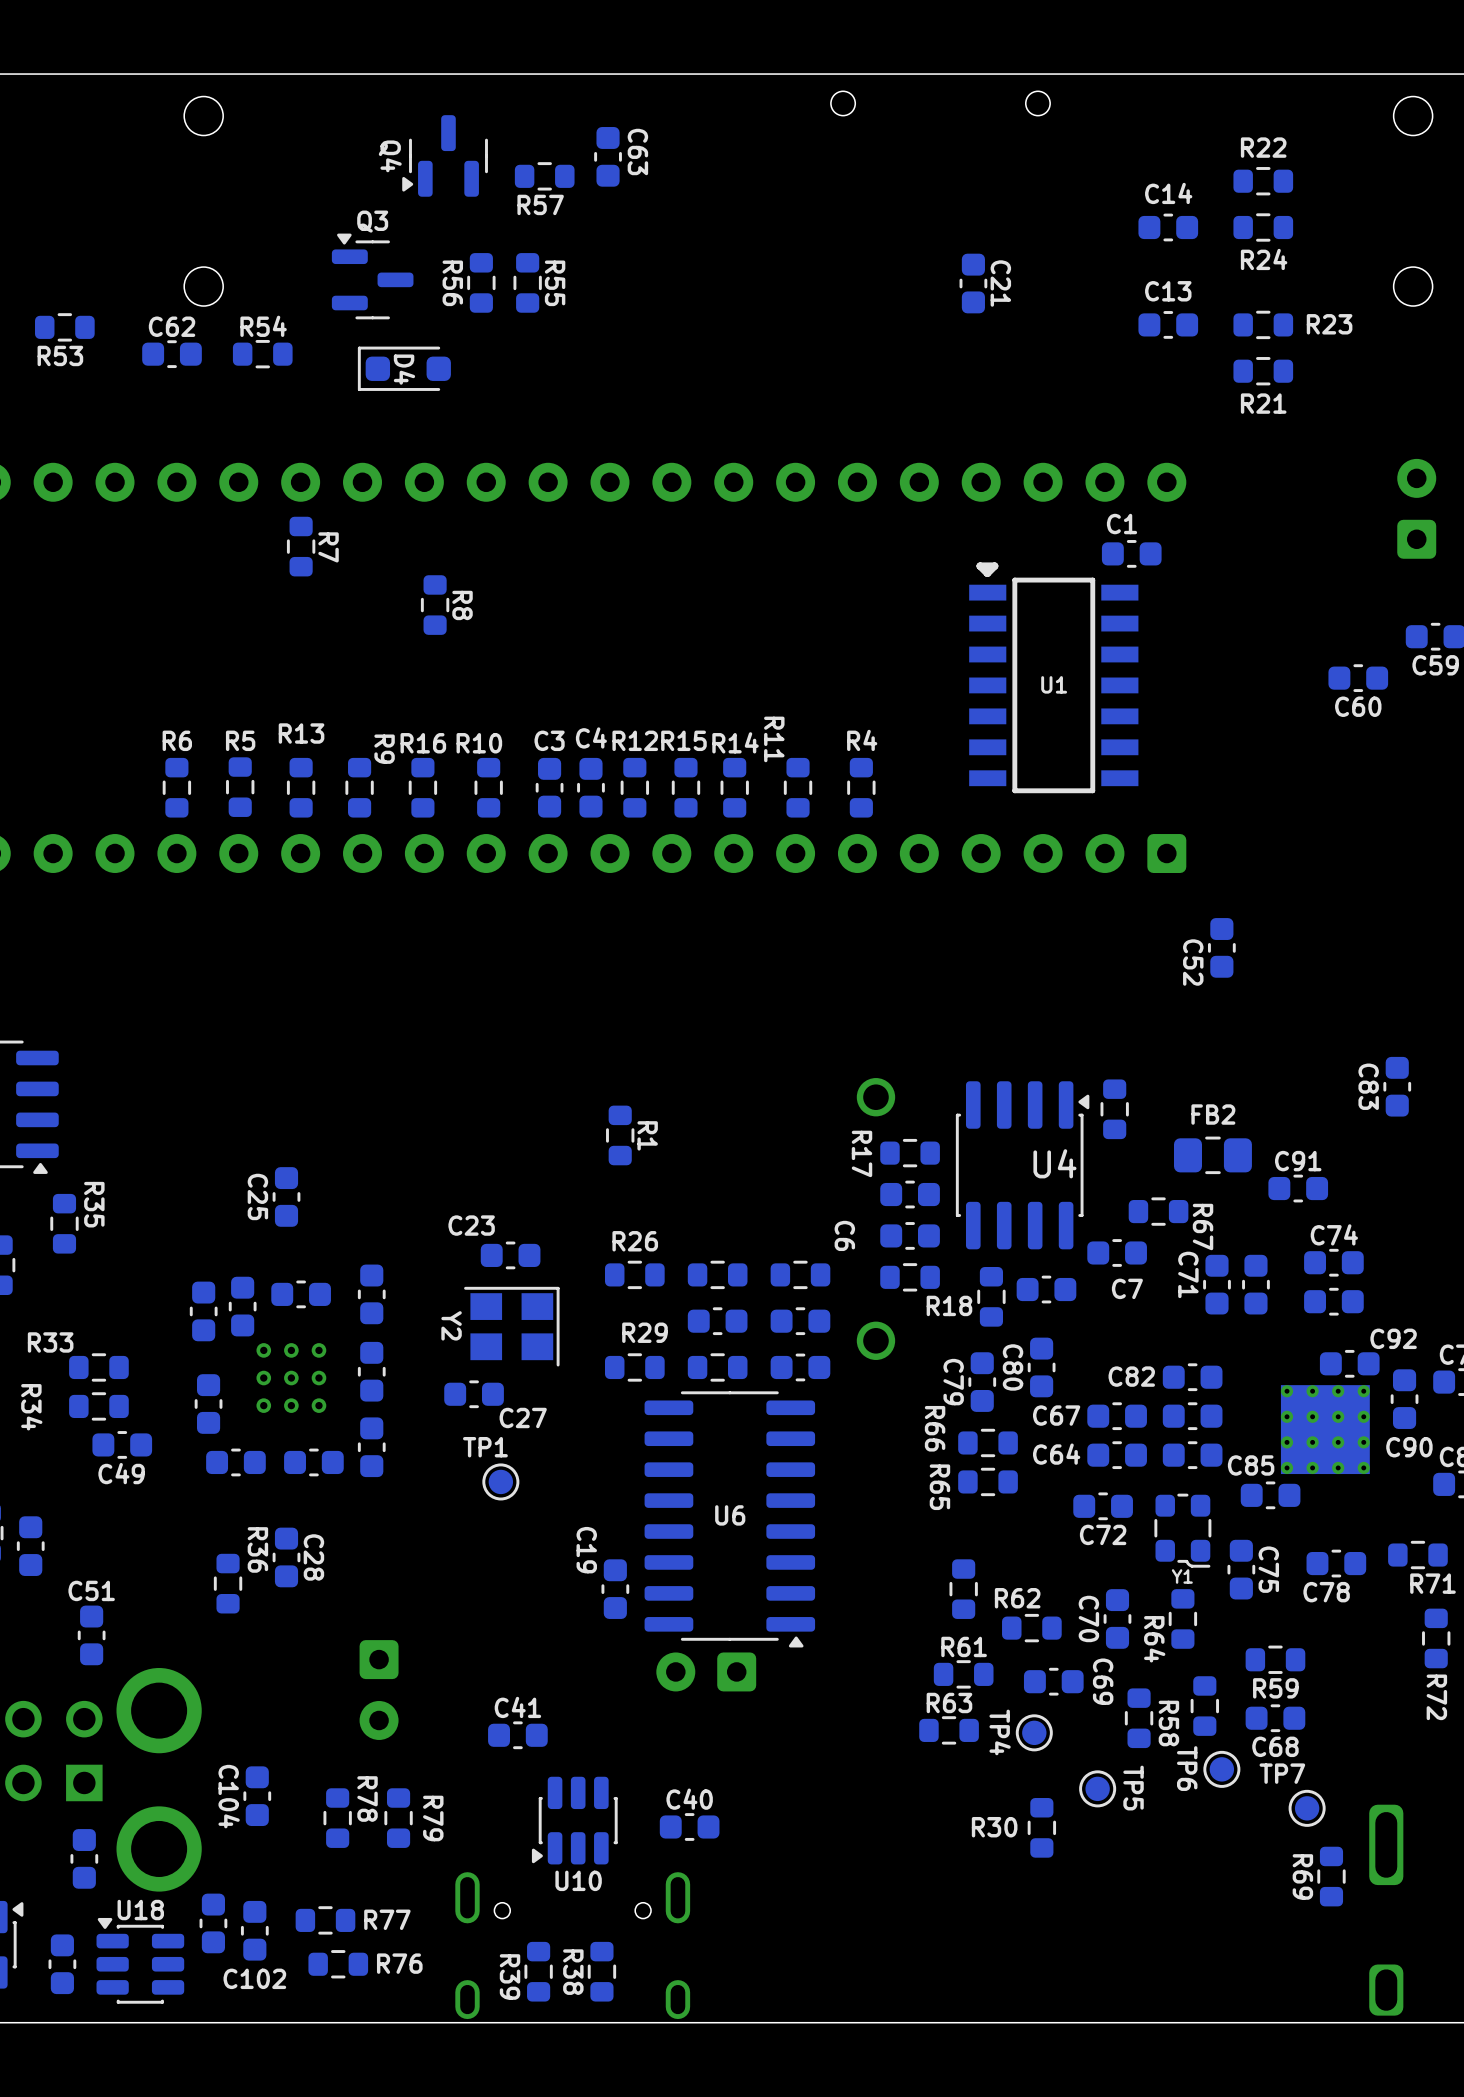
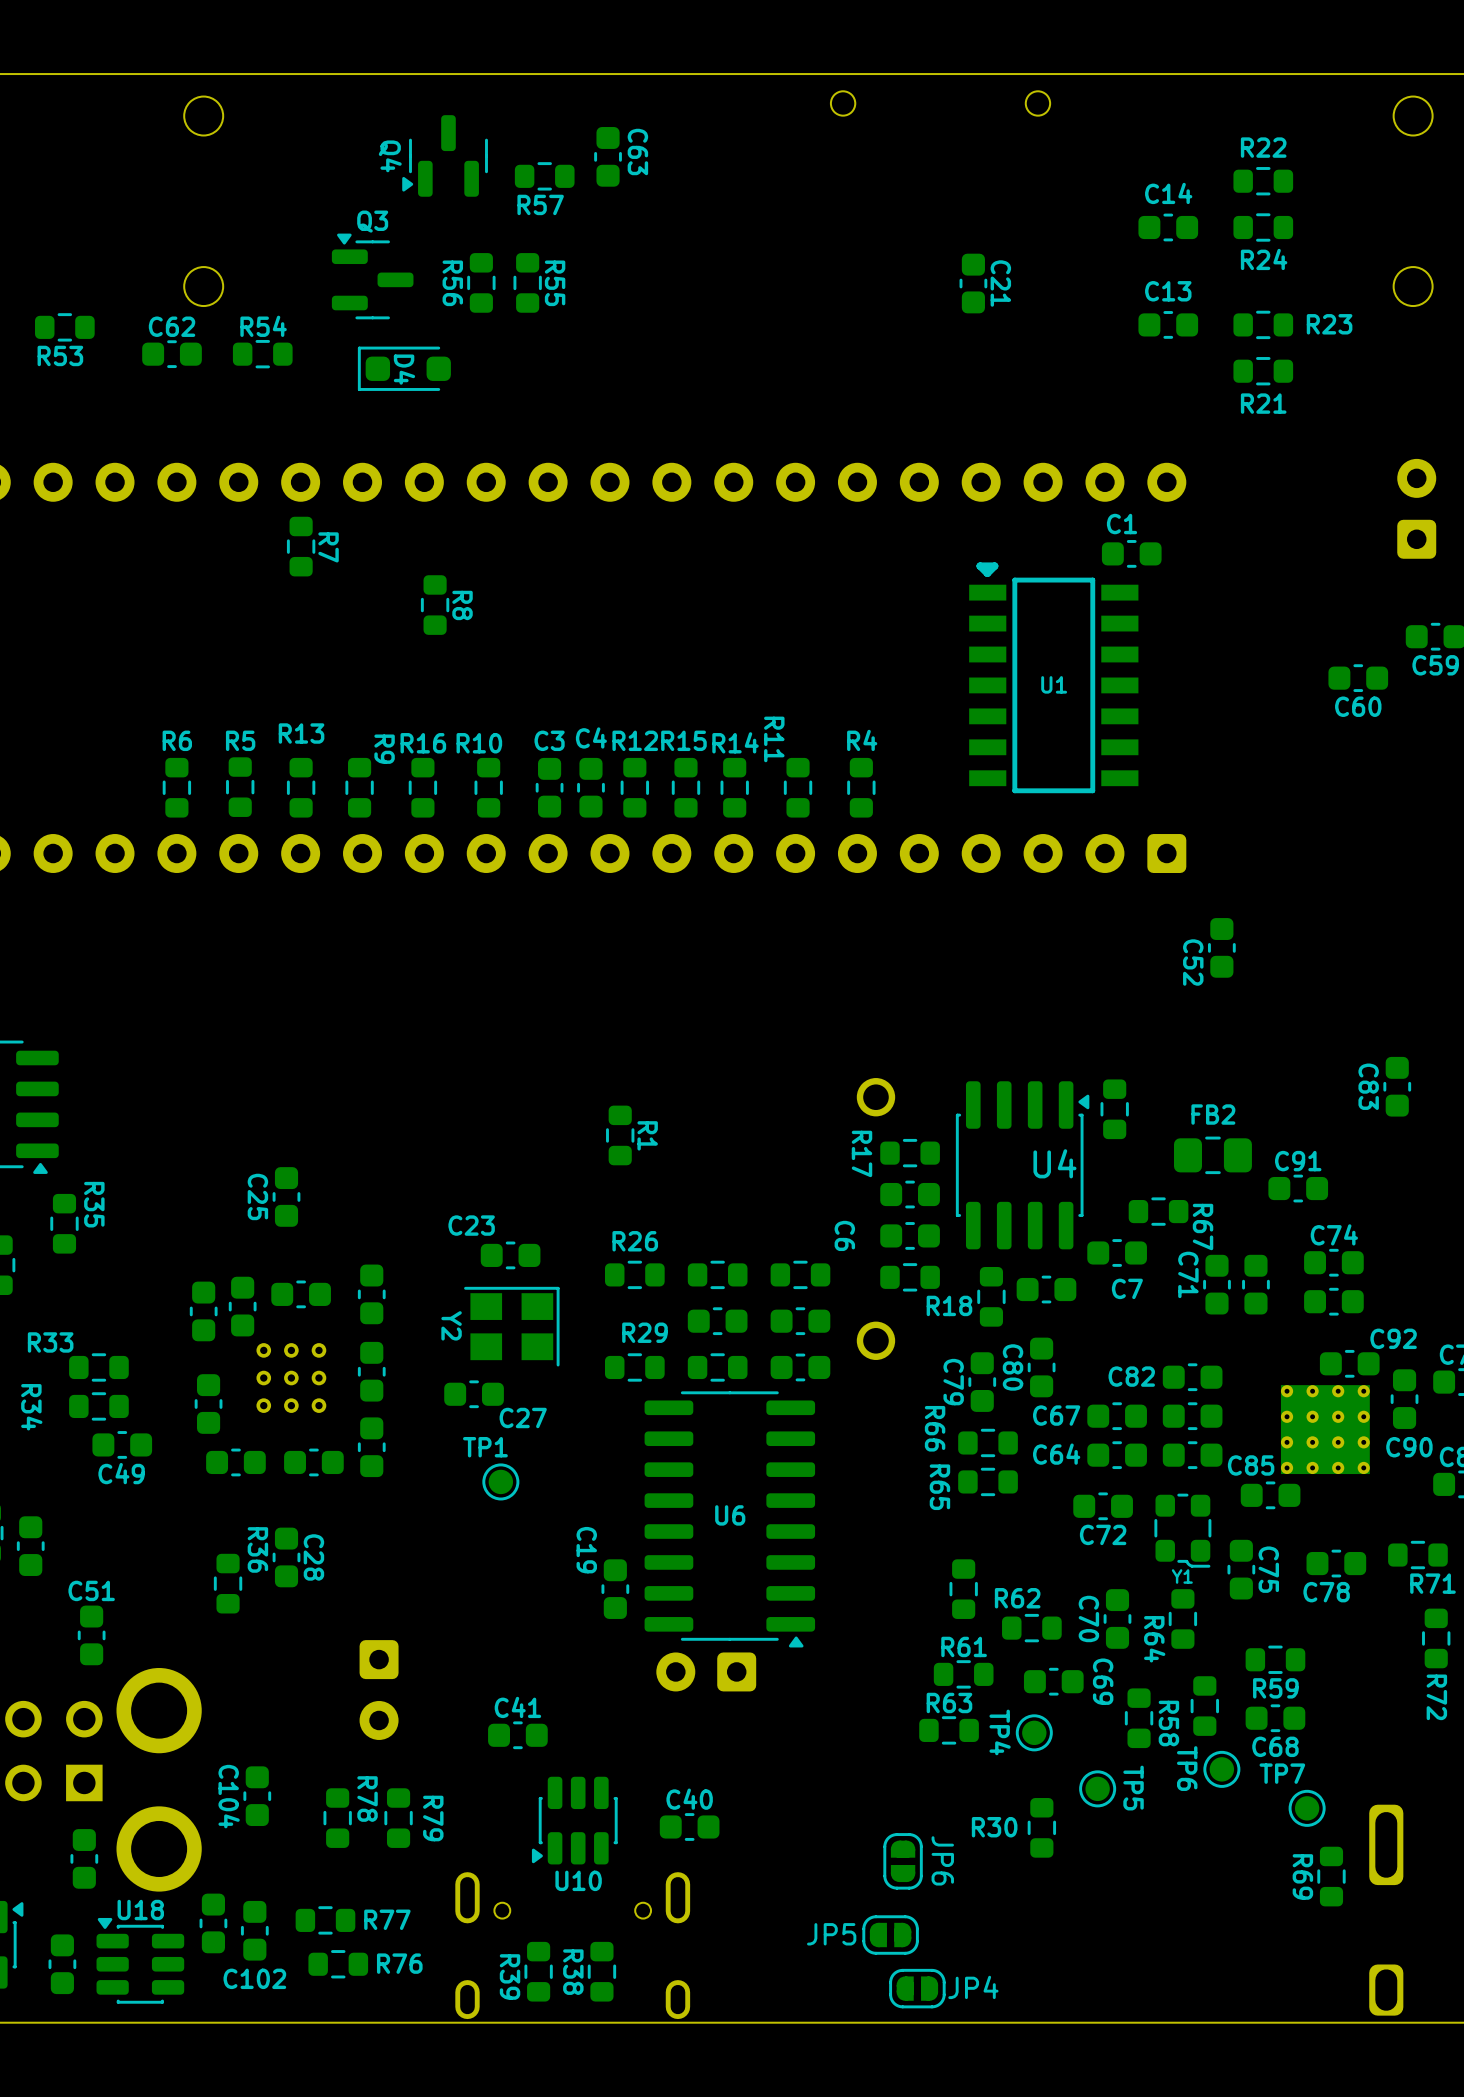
JP6: none -> (903, 1861)
JP5: none -> (890, 1935)
JP4: none -> (917, 1988)

